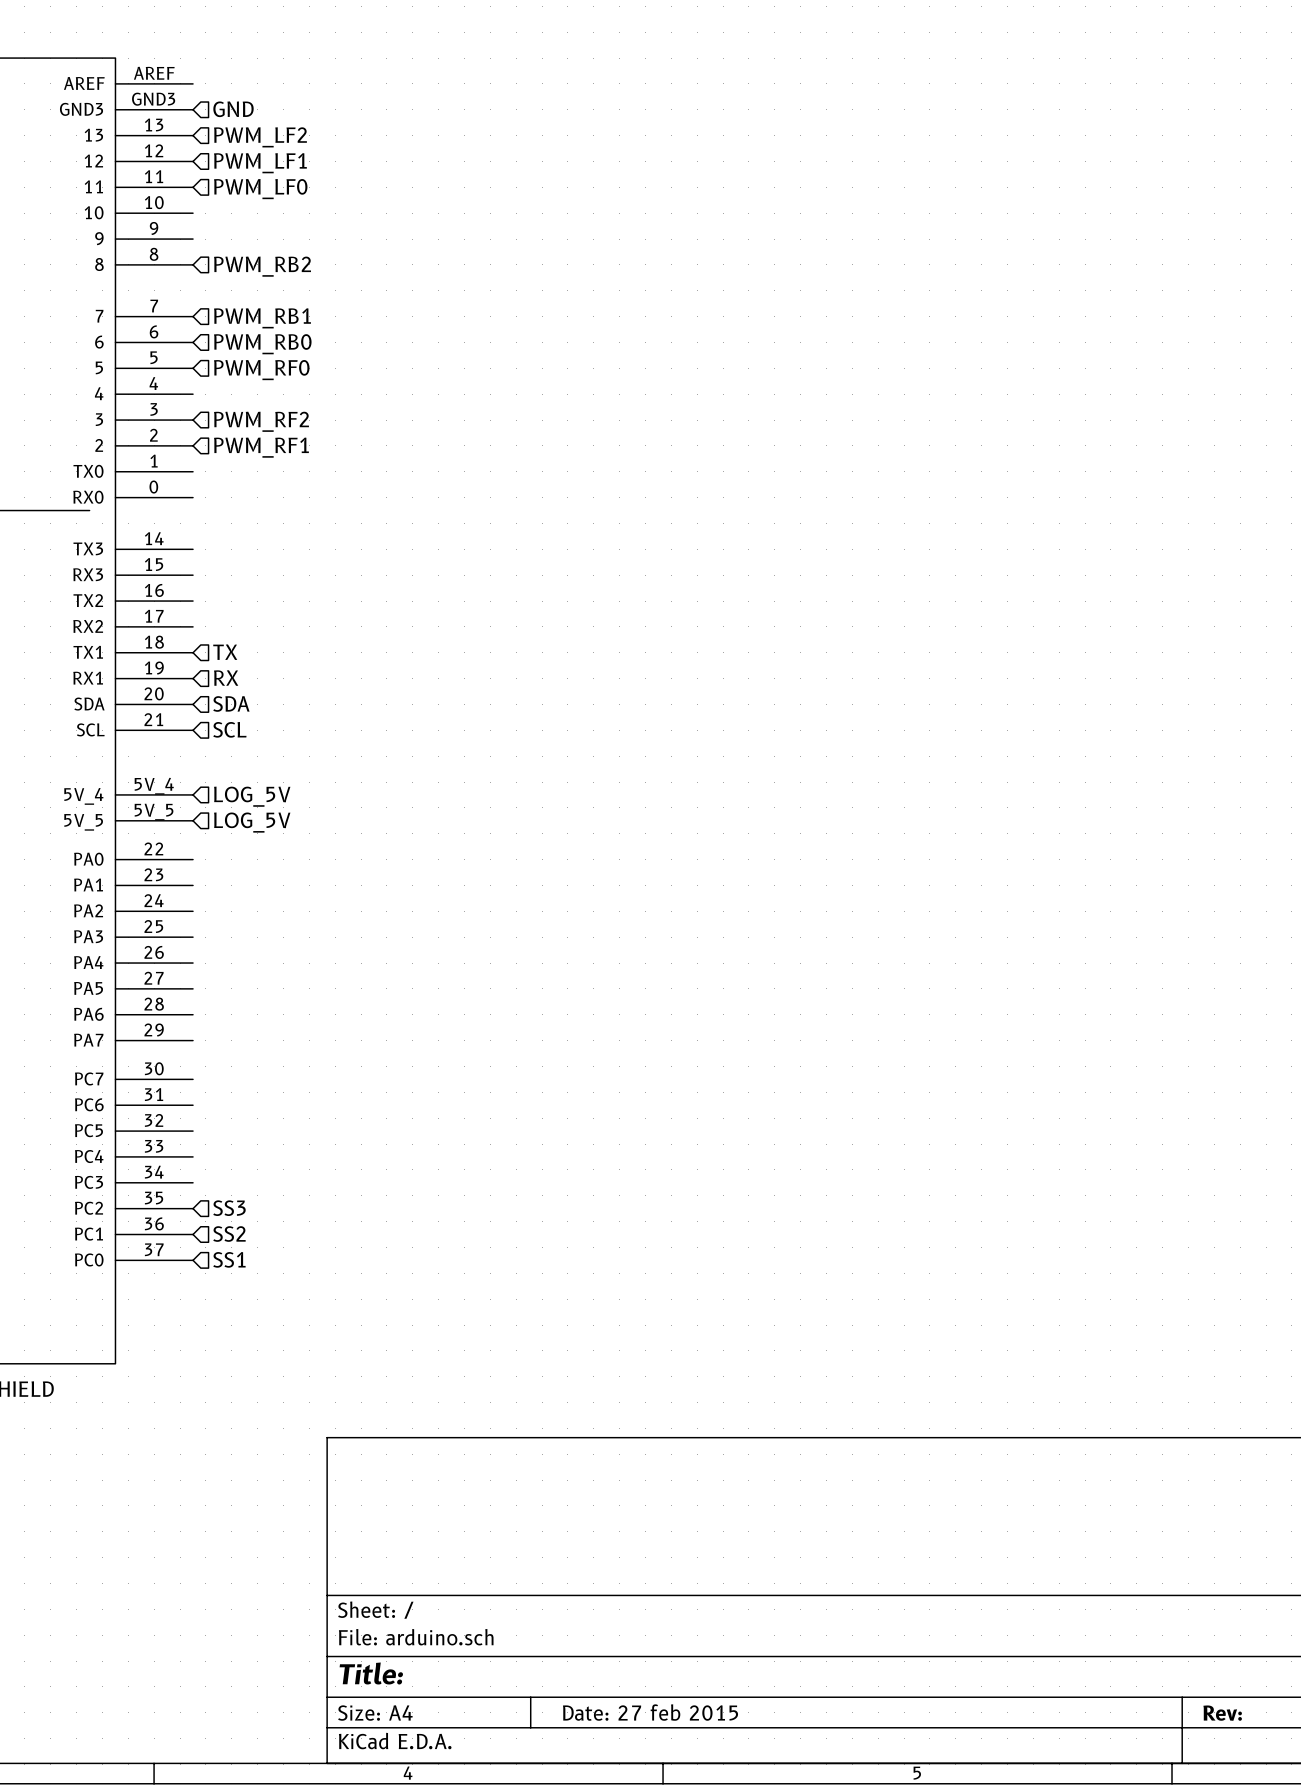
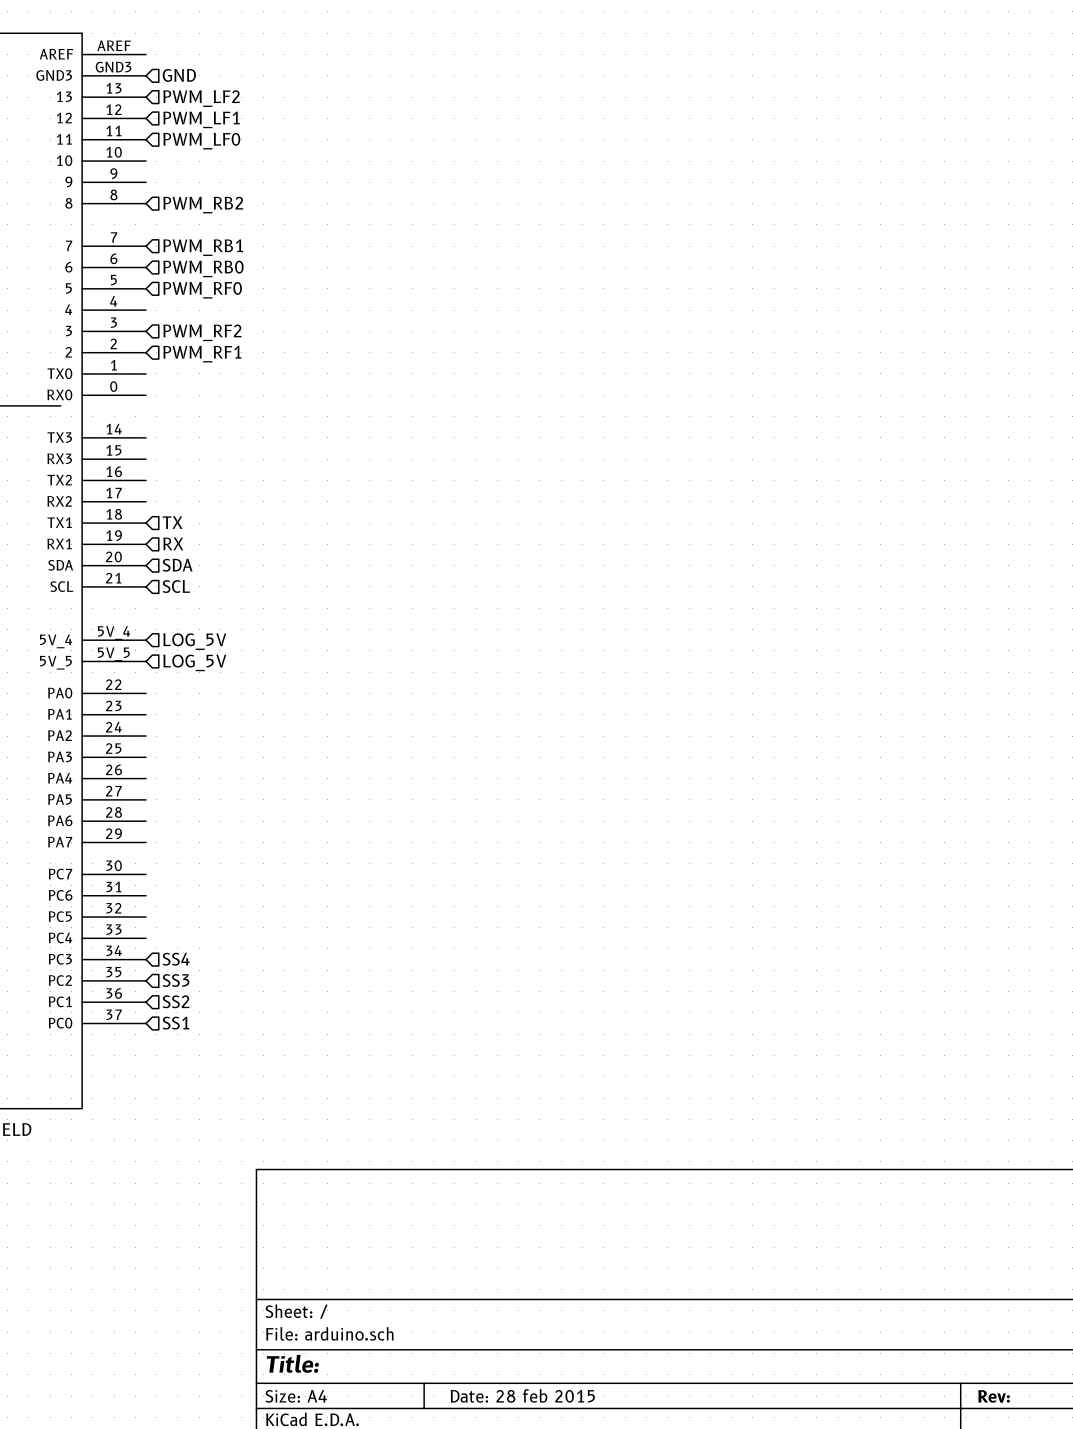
hierarchical label: none -> SS4 (176, 959)
title block: Date: 27 feb 2015 (650, 1712) -> Date: 28 feb 2015 (522, 1395)

